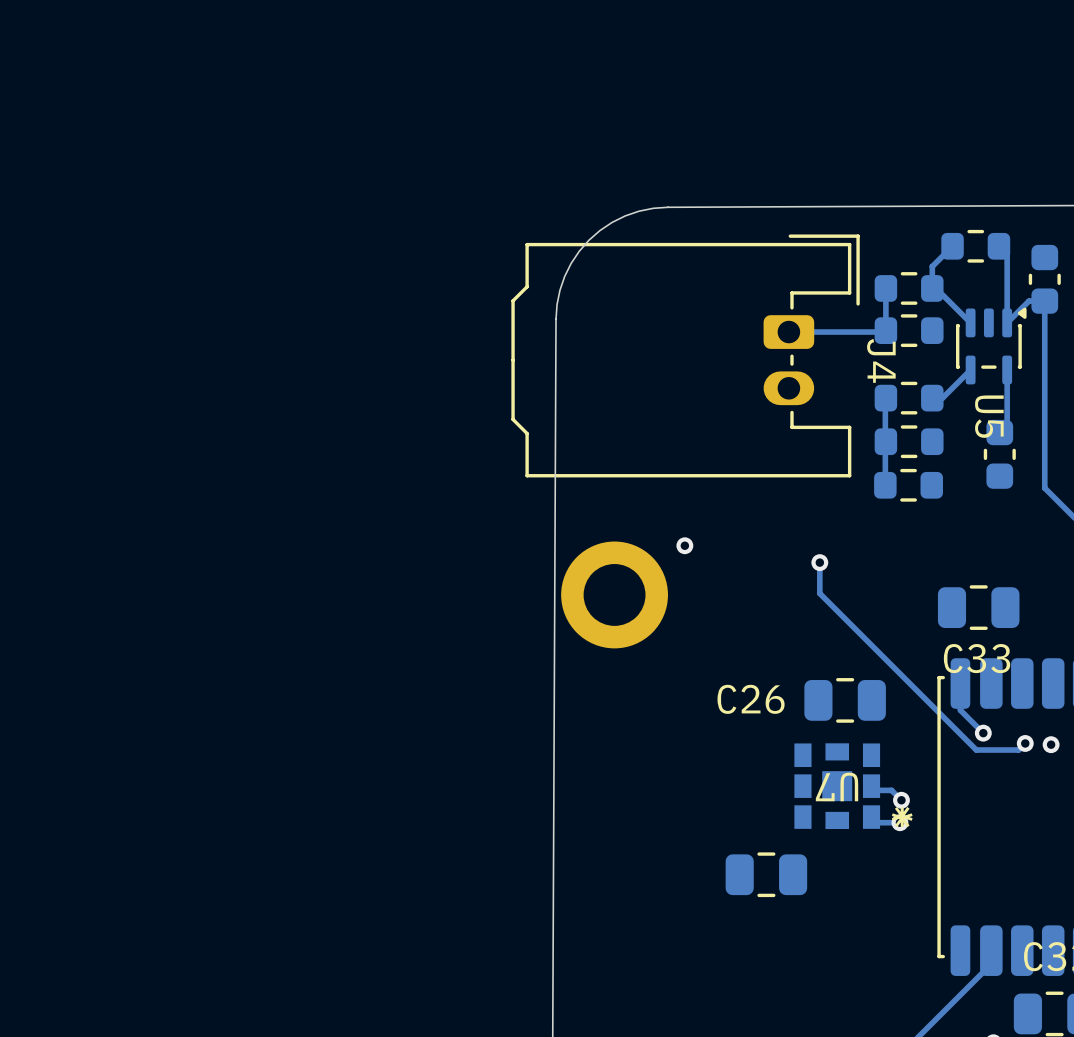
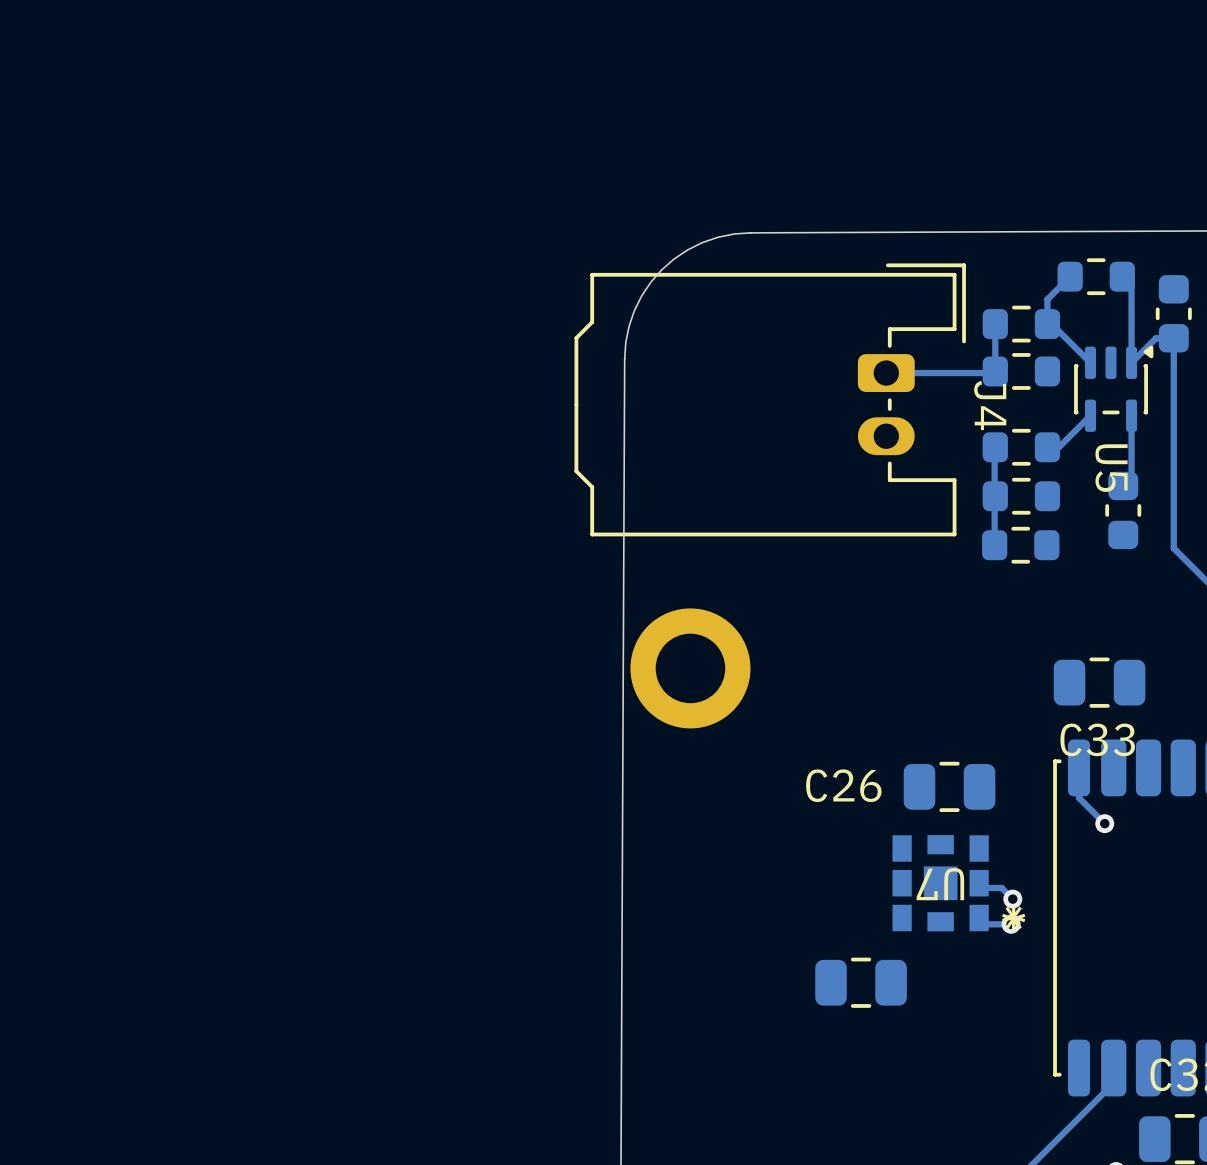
via: (684, 545) -> none
track: (819, 562) (819, 593) (976, 750) (1018, 750) (1025, 743) -> none
via: (819, 562) -> none
via: (1025, 743) -> none
via: (1051, 744) -> none

